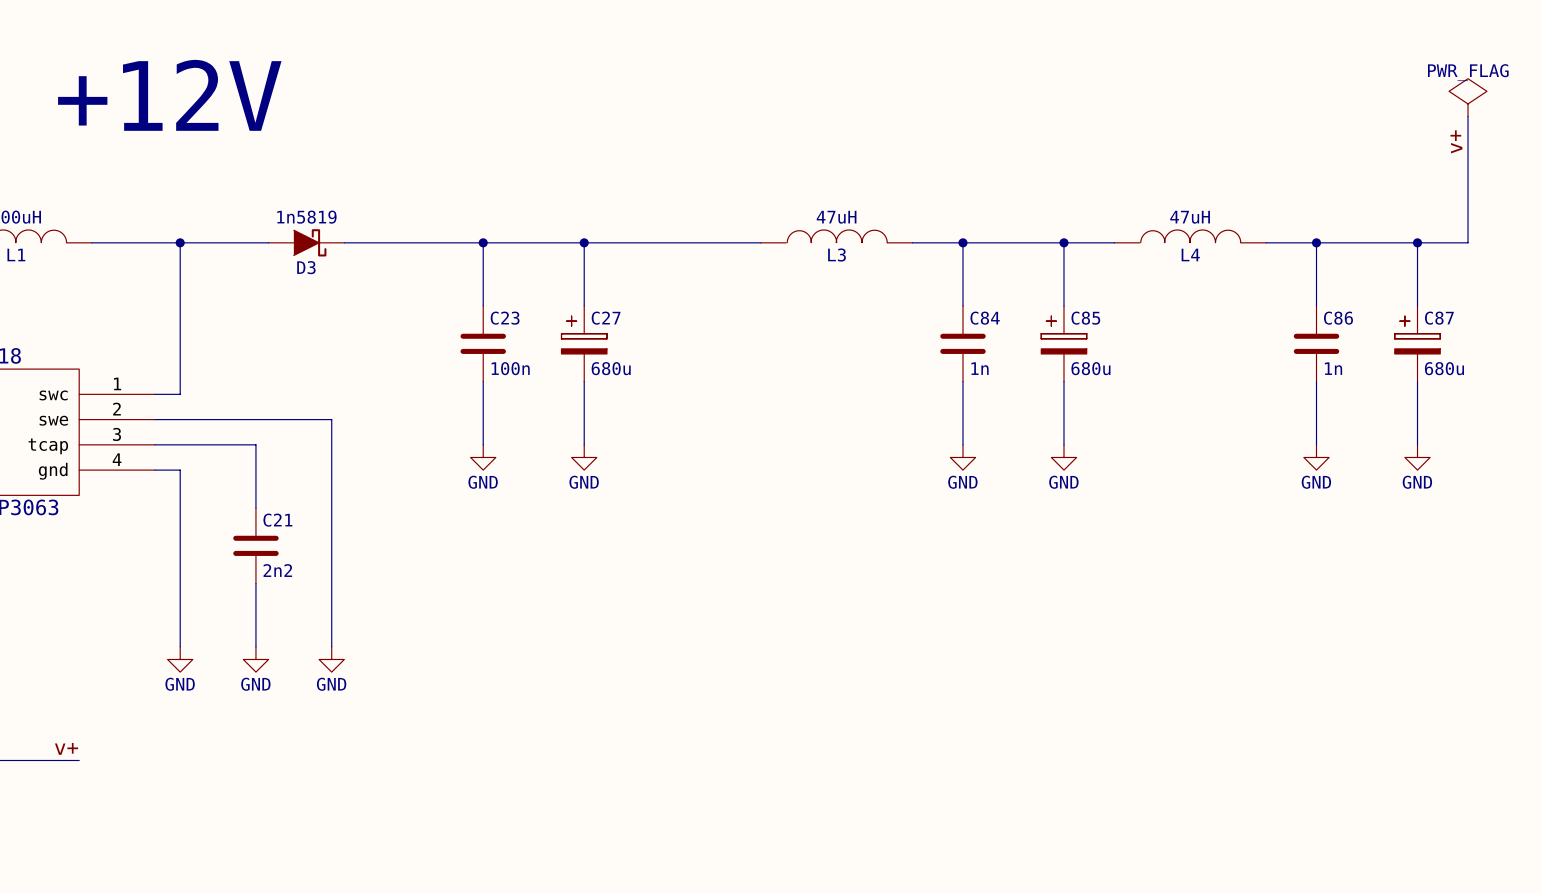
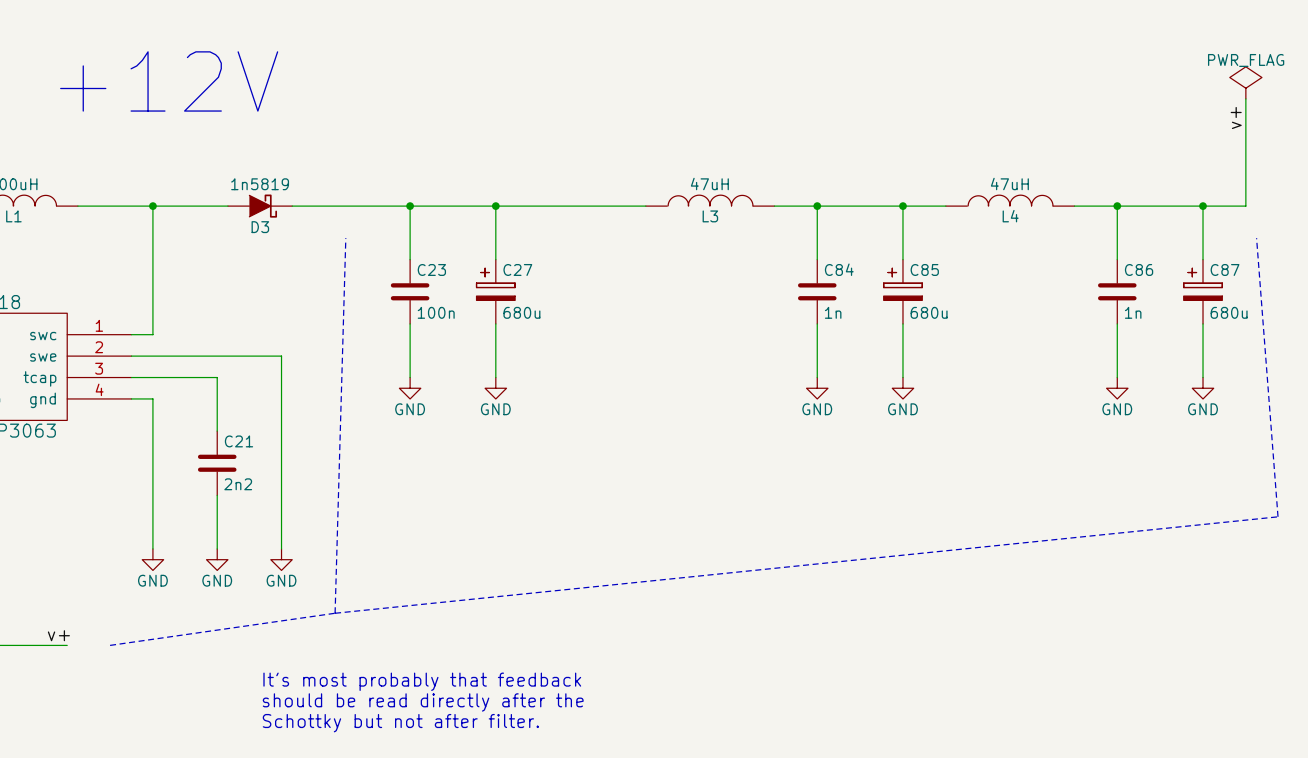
line: none -> (345, 238) (335, 613)
line: none -> (1256, 238) (1278, 516) (335, 613)
line: none -> (335, 613) (110, 645)
text: none -> It's most probably that feedback (422, 681)
text: none -> should be read directly after the (423, 702)
text: none -> Schottky but not after filter. (400, 723)

